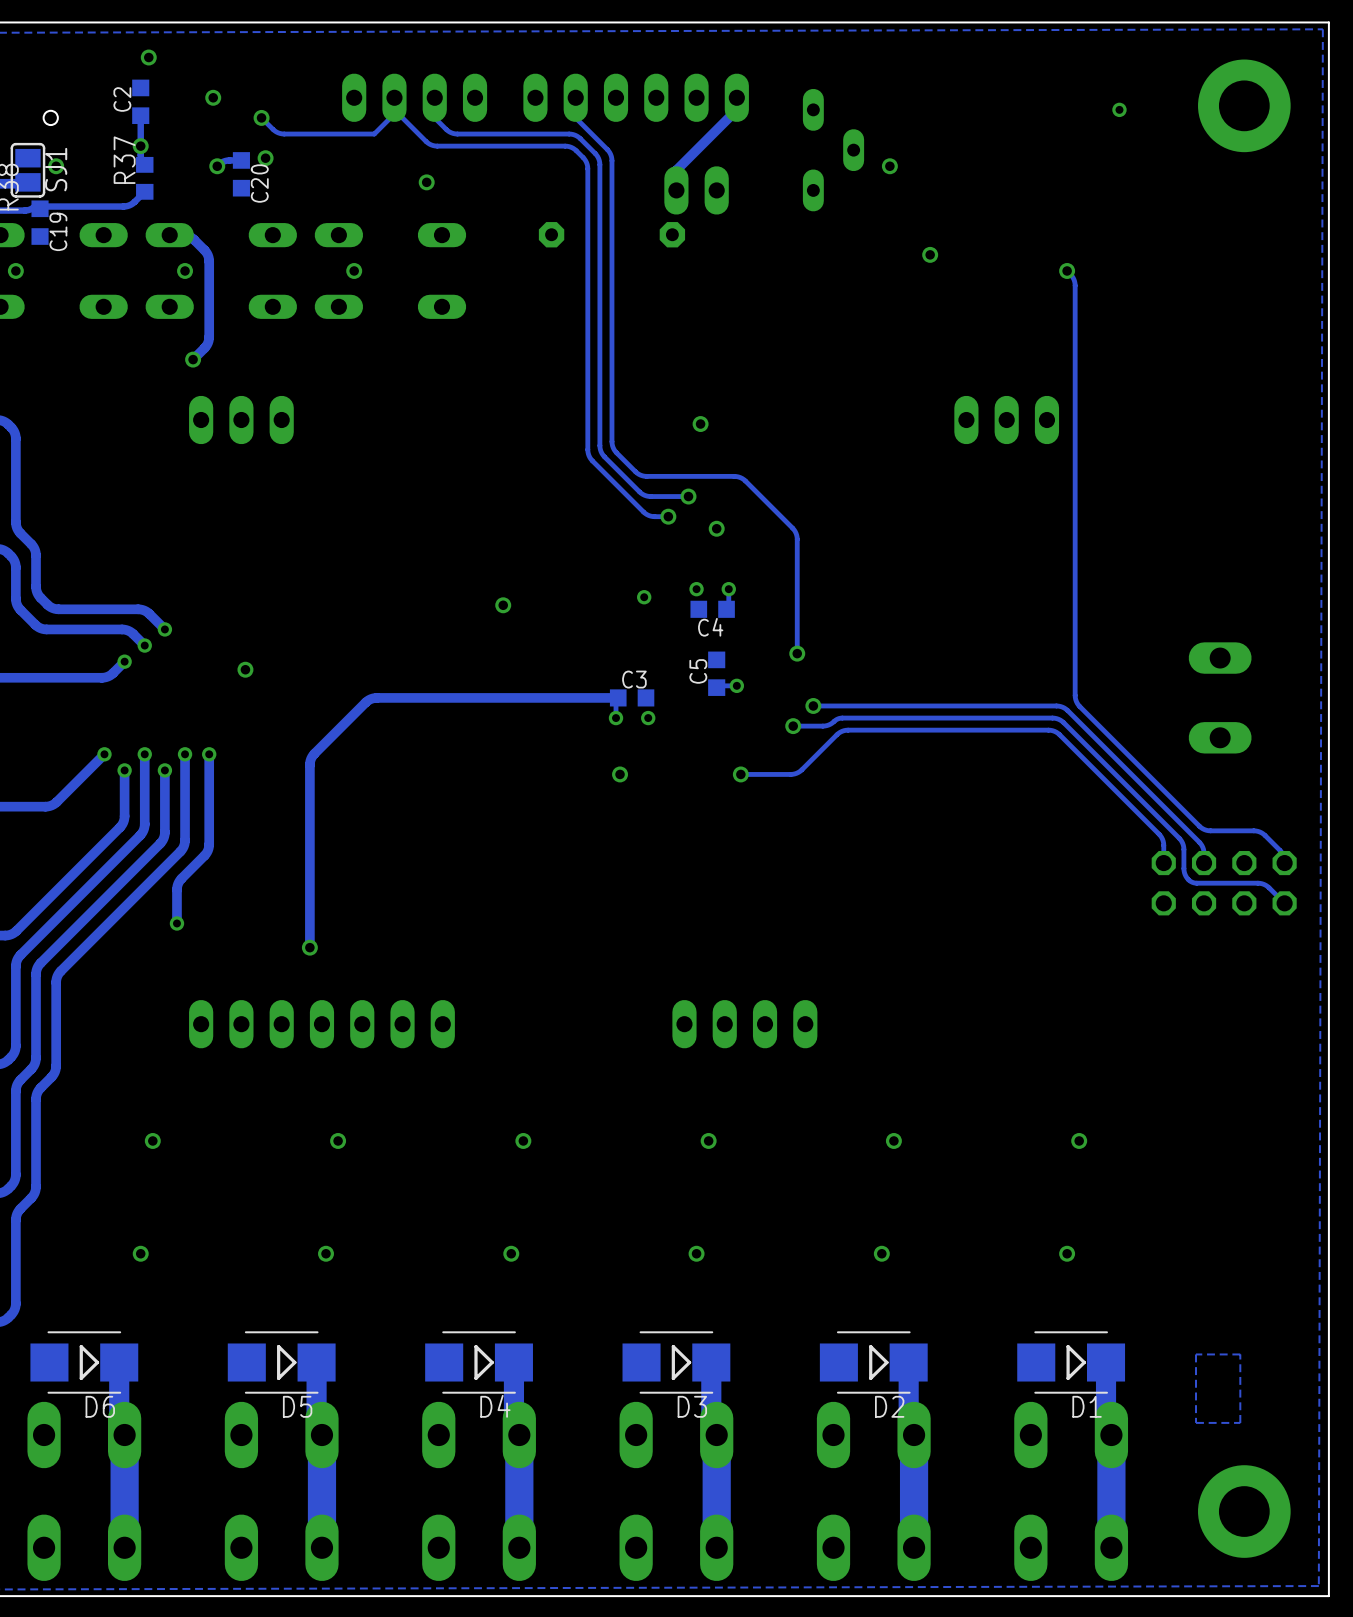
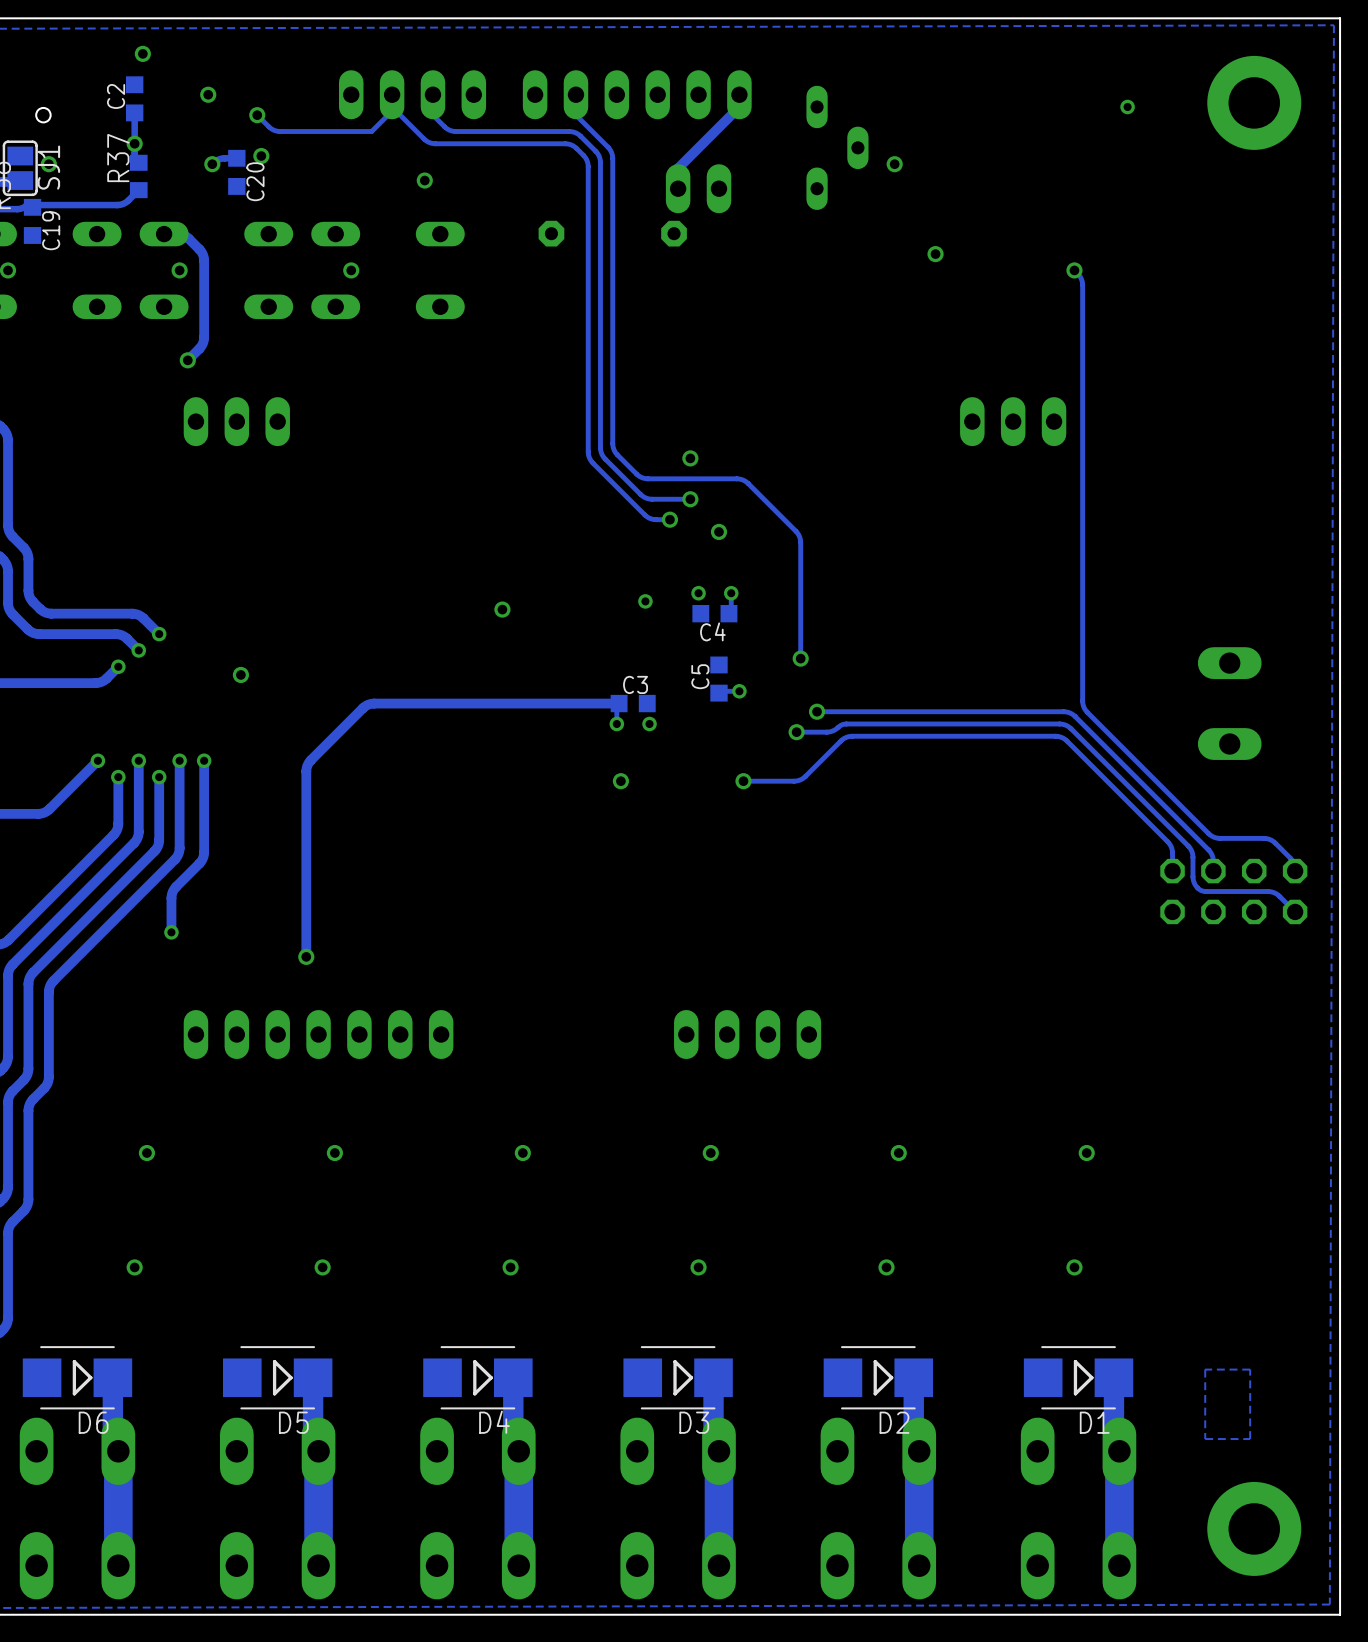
via position: (700, 424) -> (690, 458)

